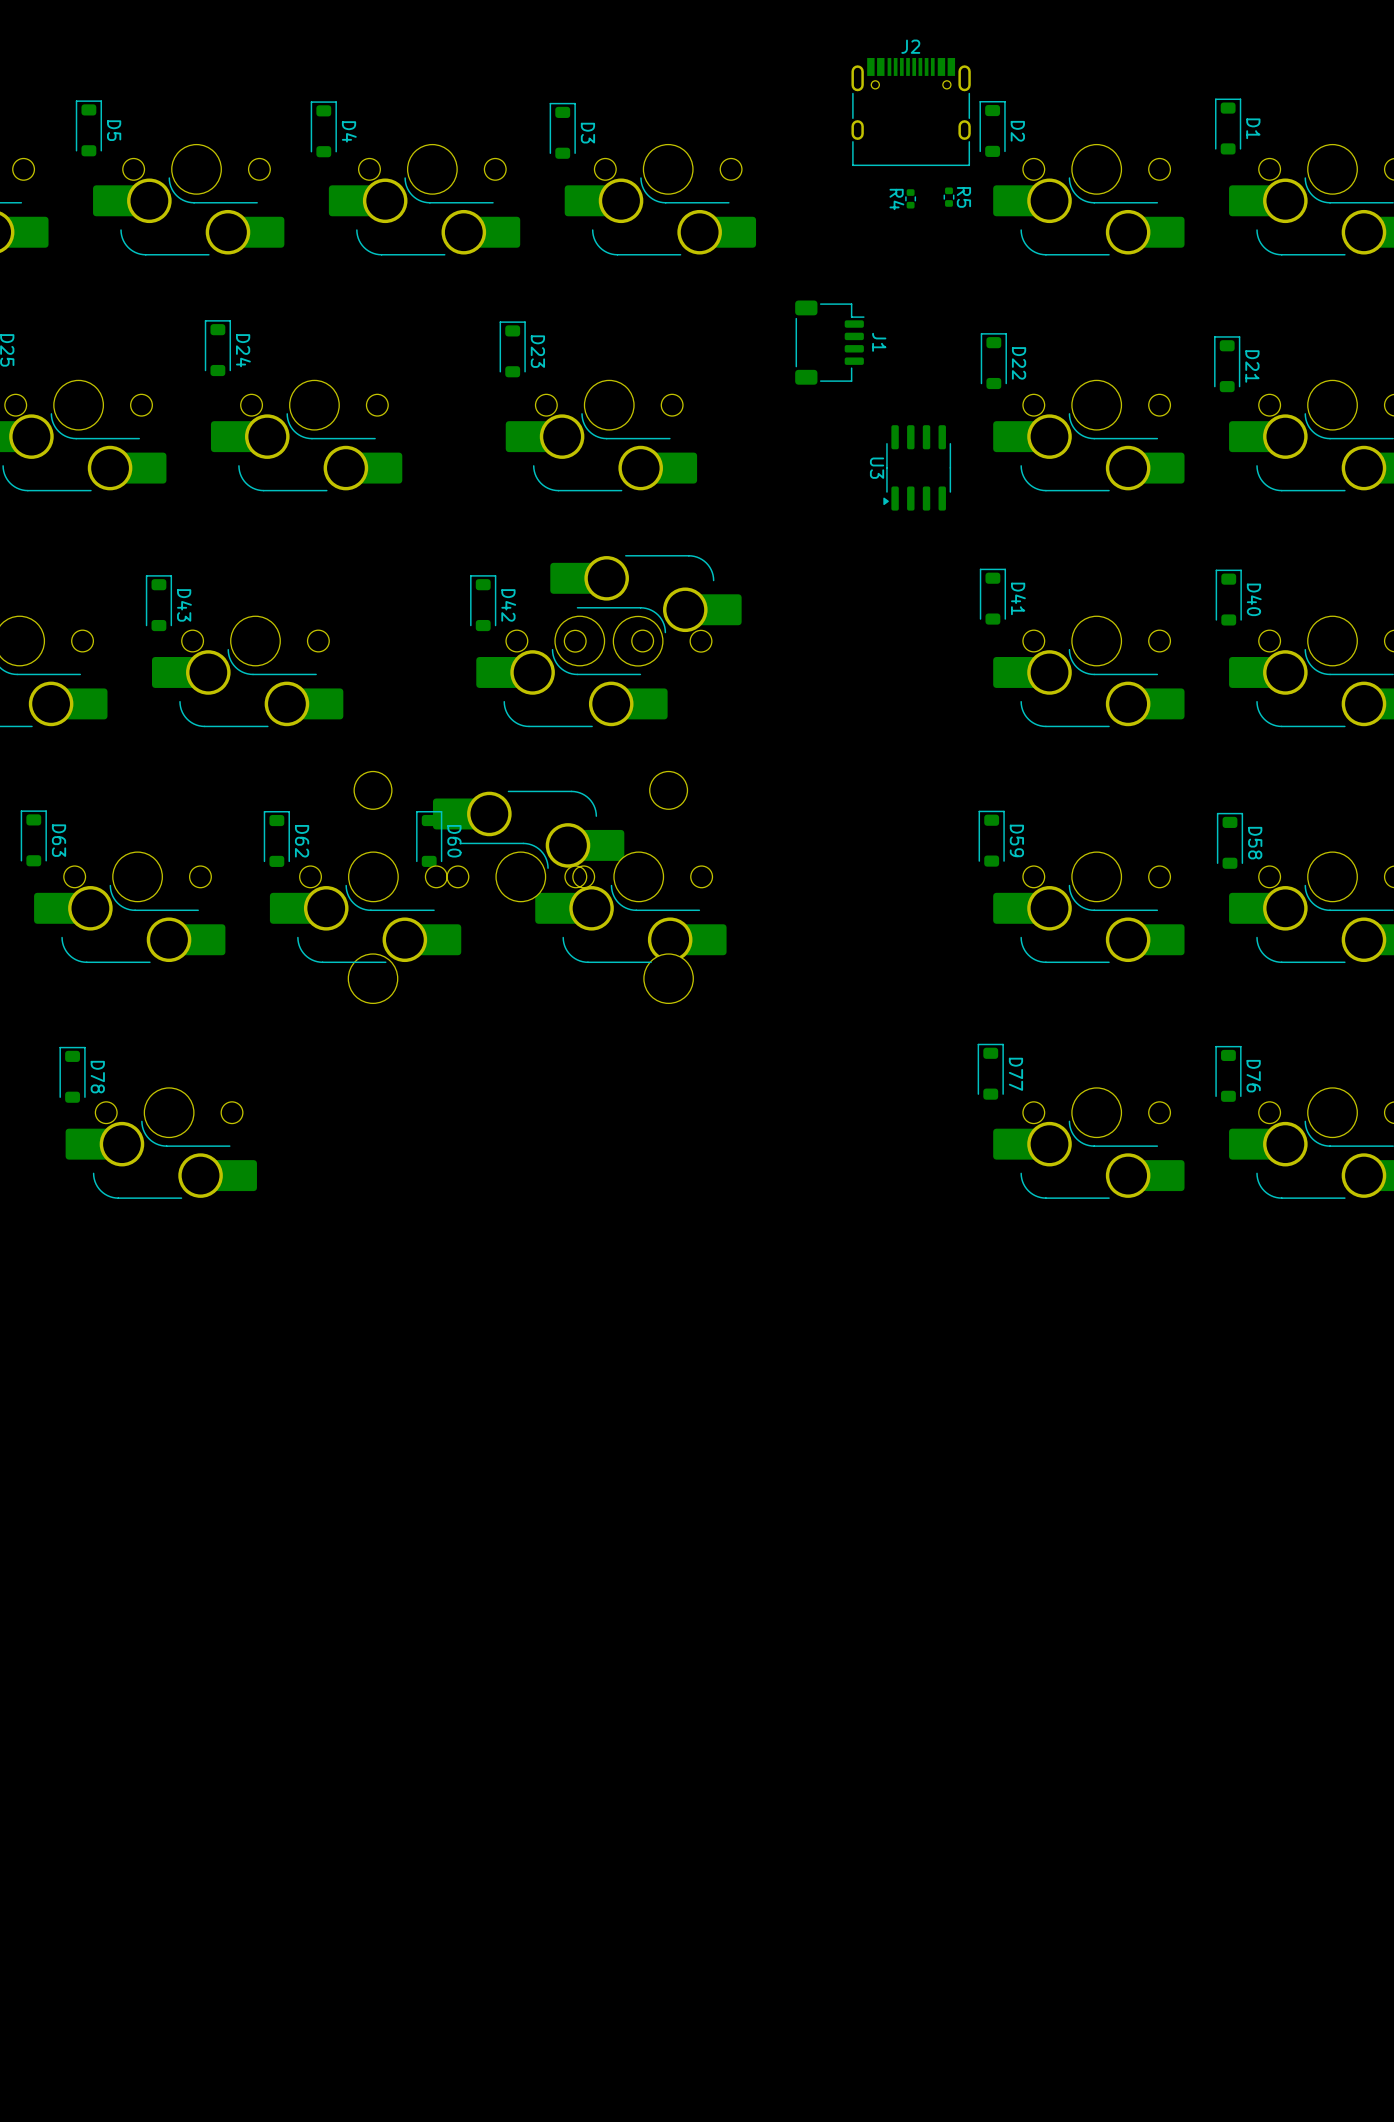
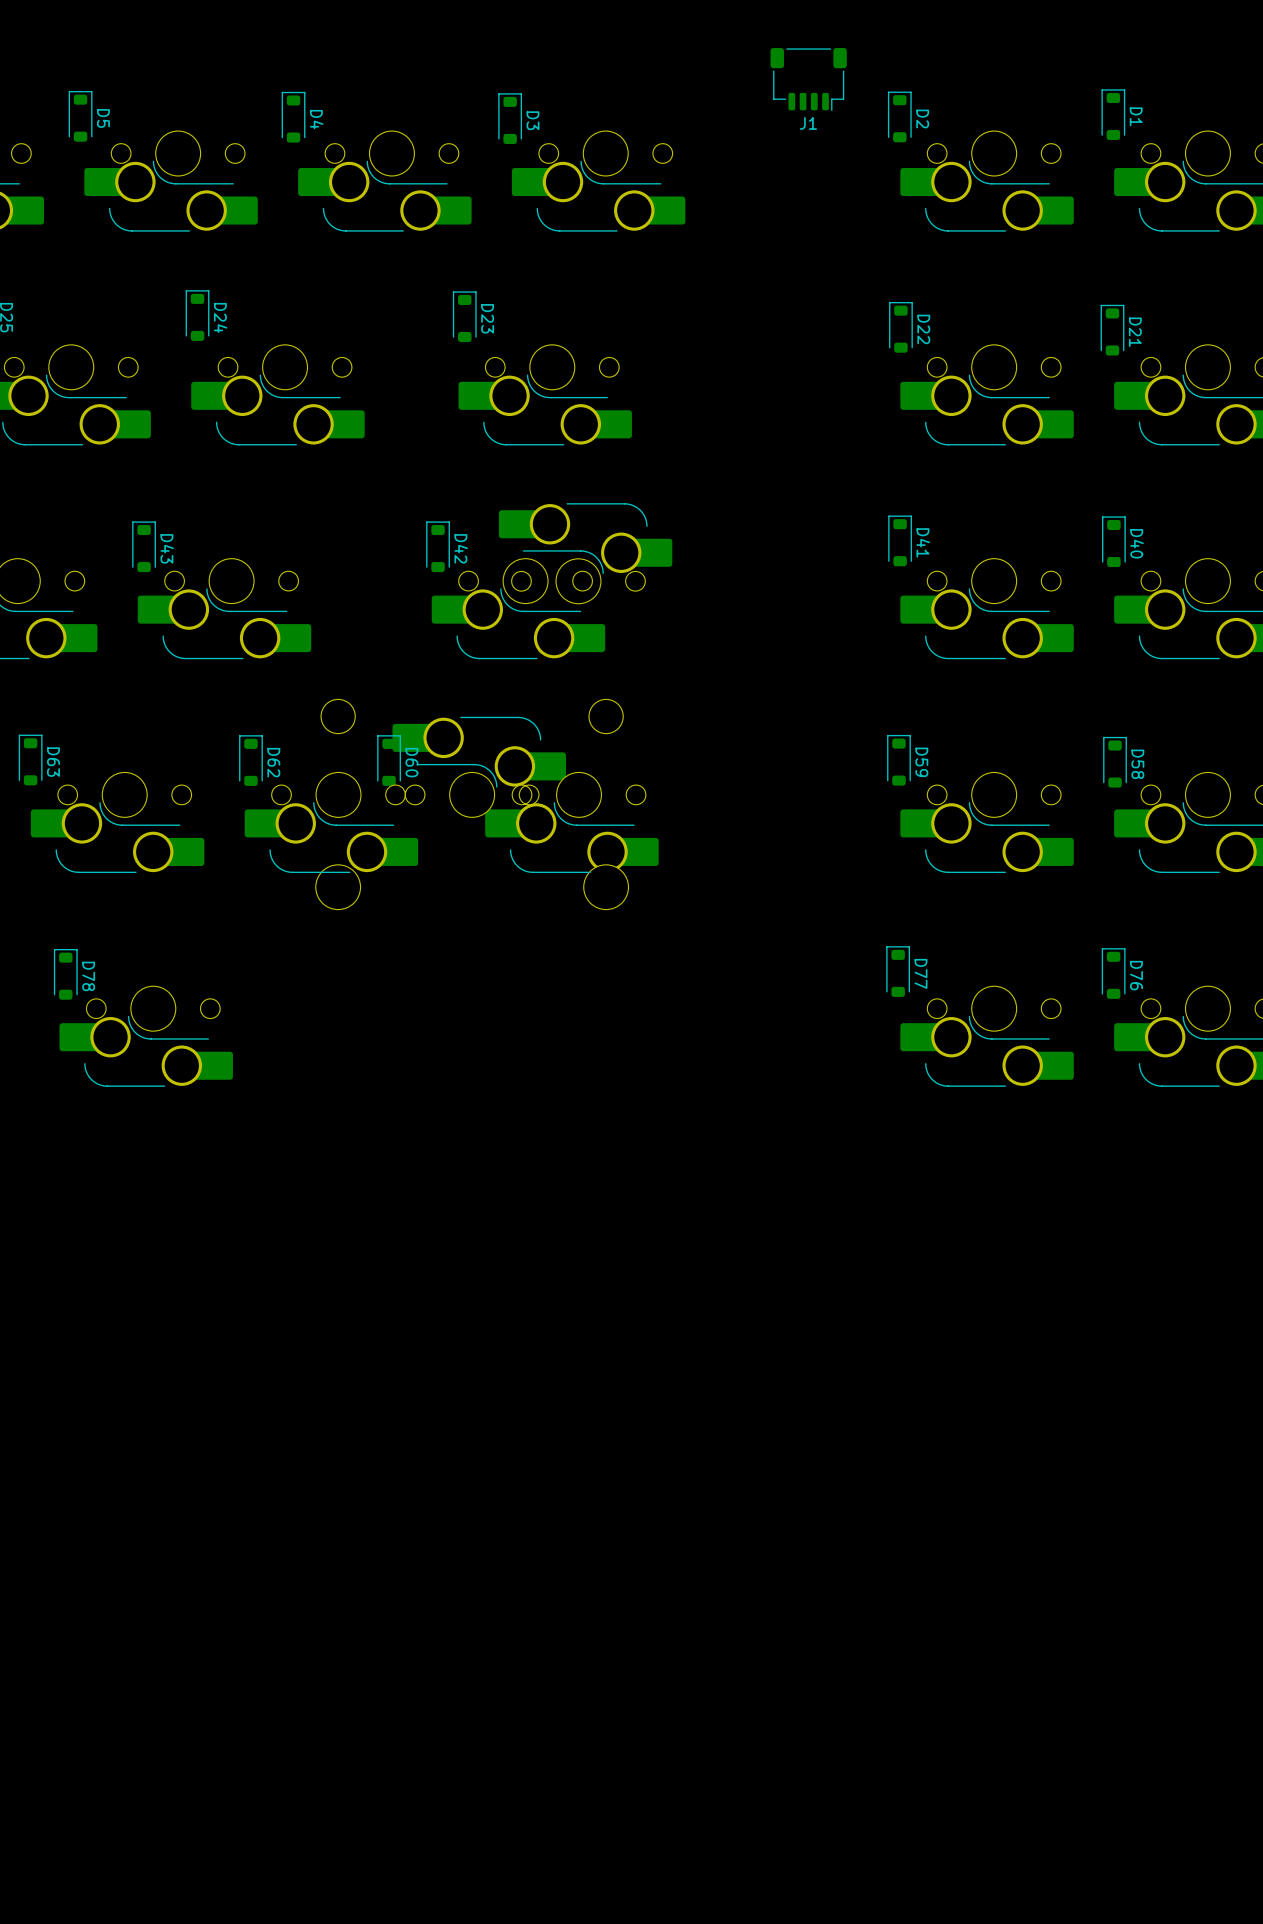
J2: (911, 112) -> none
R5: (948, 197) -> none
R4: (910, 198) -> none
J1 rotation: 0° (829, 342) -> 90° clockwise (808, 79)
J1 position: (829, 342) -> (808, 79)
U3: (917, 467) -> none

